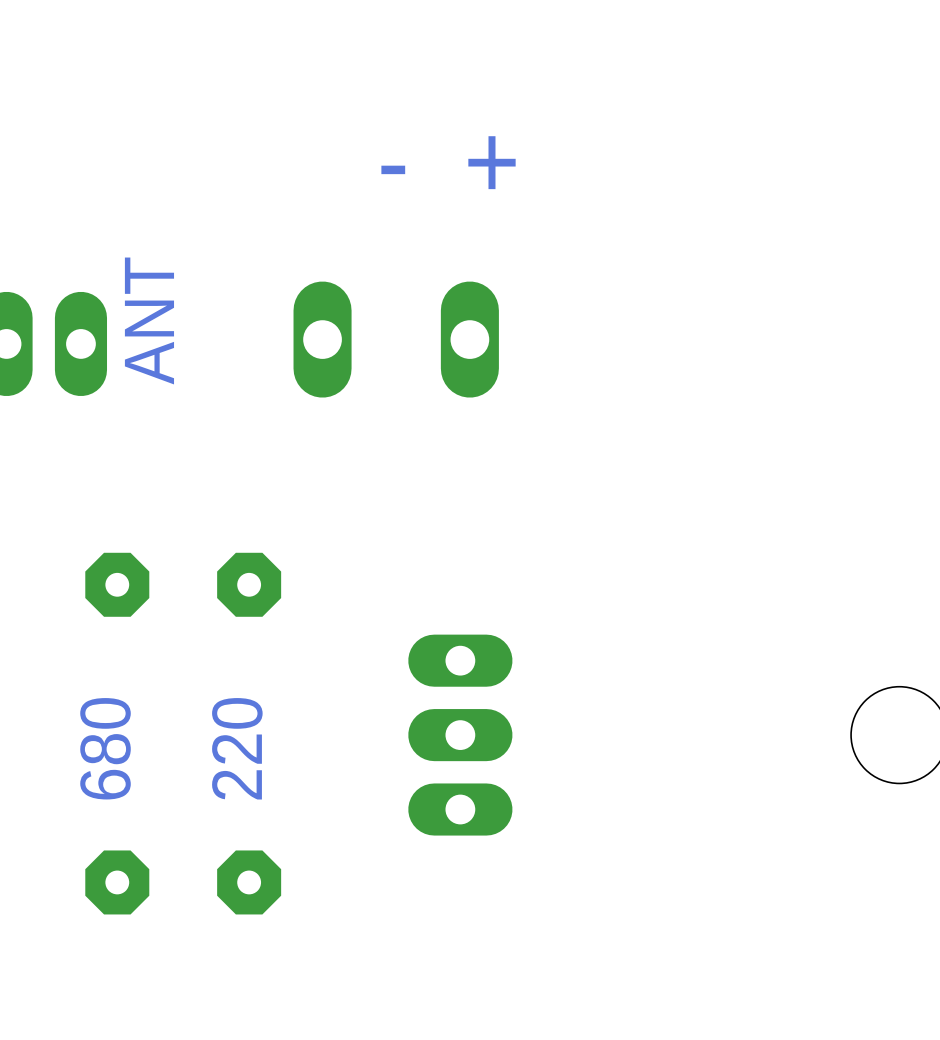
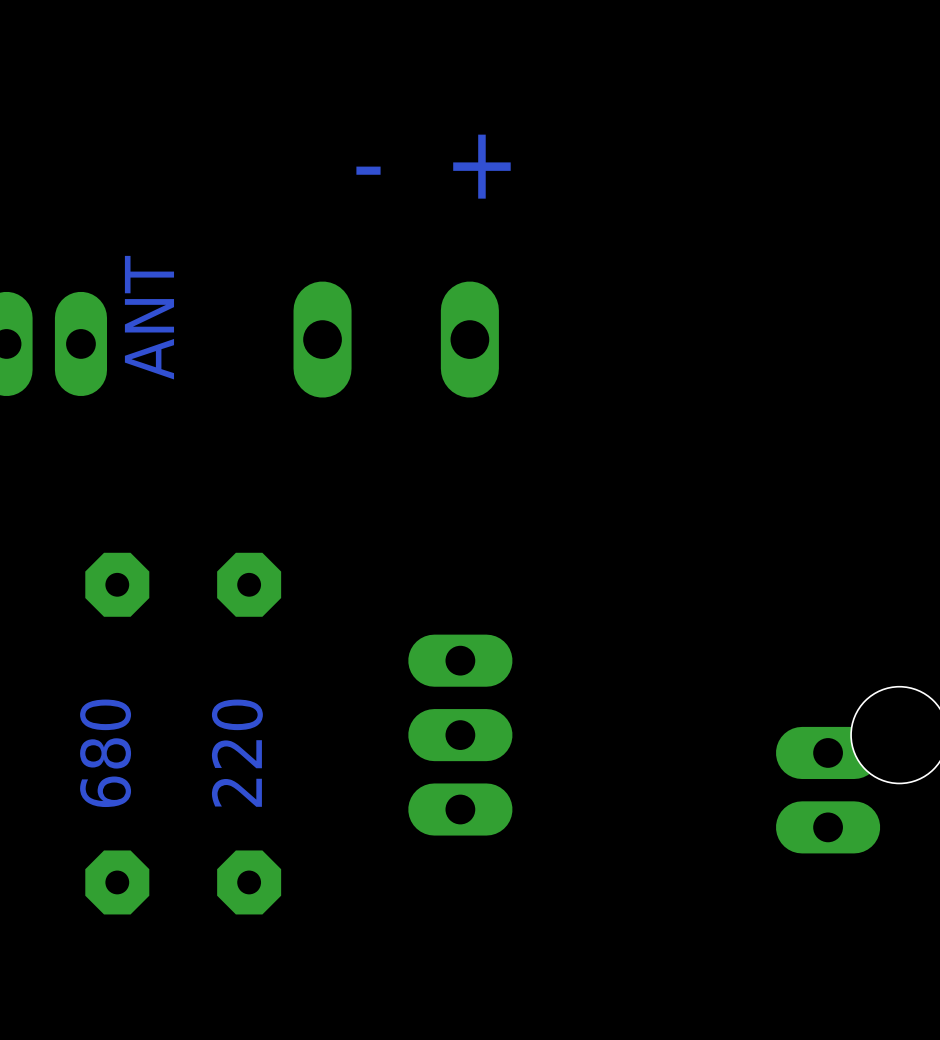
part: none -> (828, 790)

